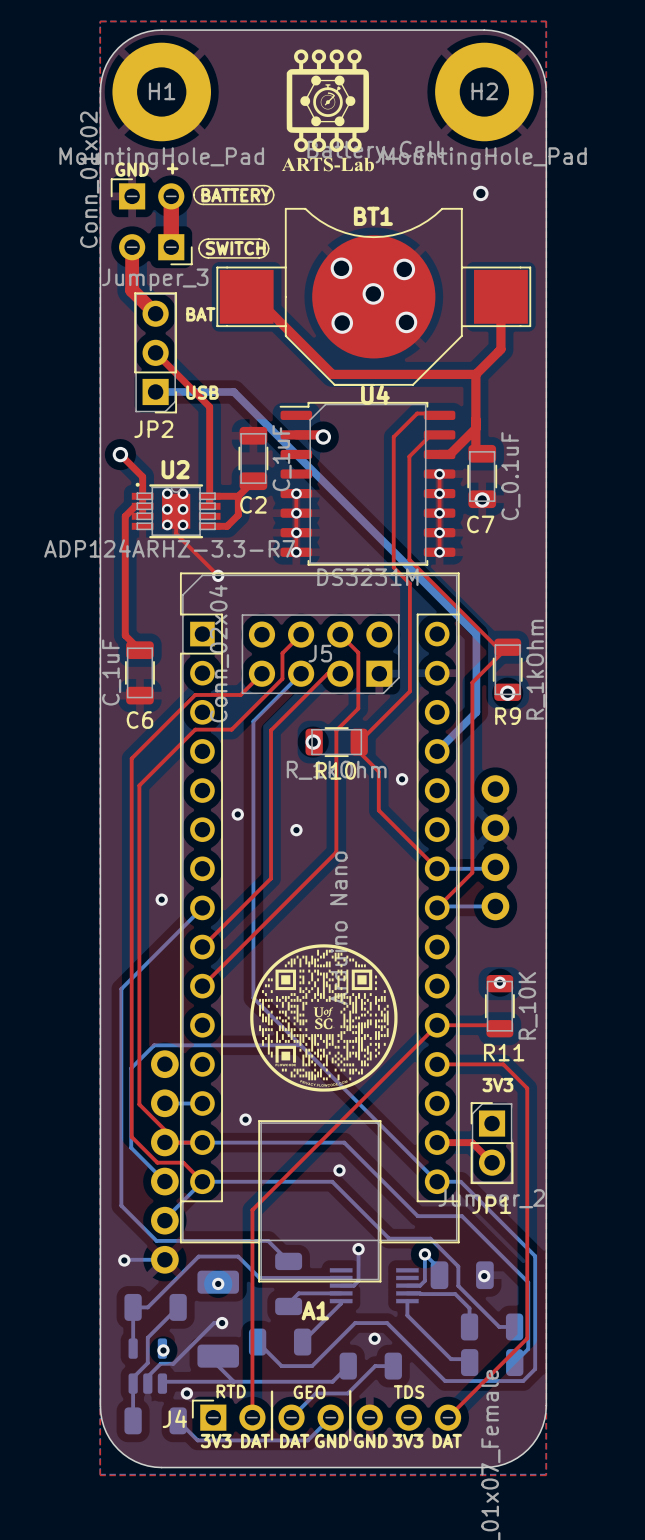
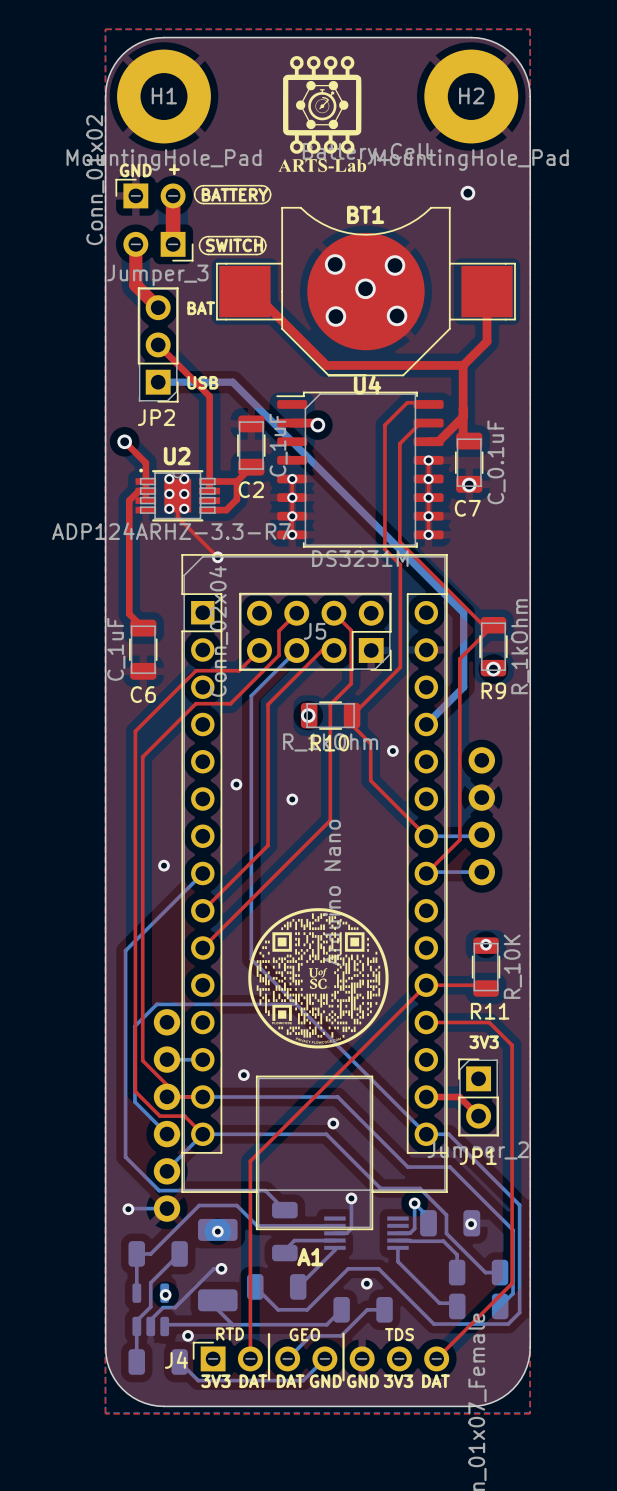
J5 footprint: [241, 614, 400, 695] -> [239, 592, 392, 671]

